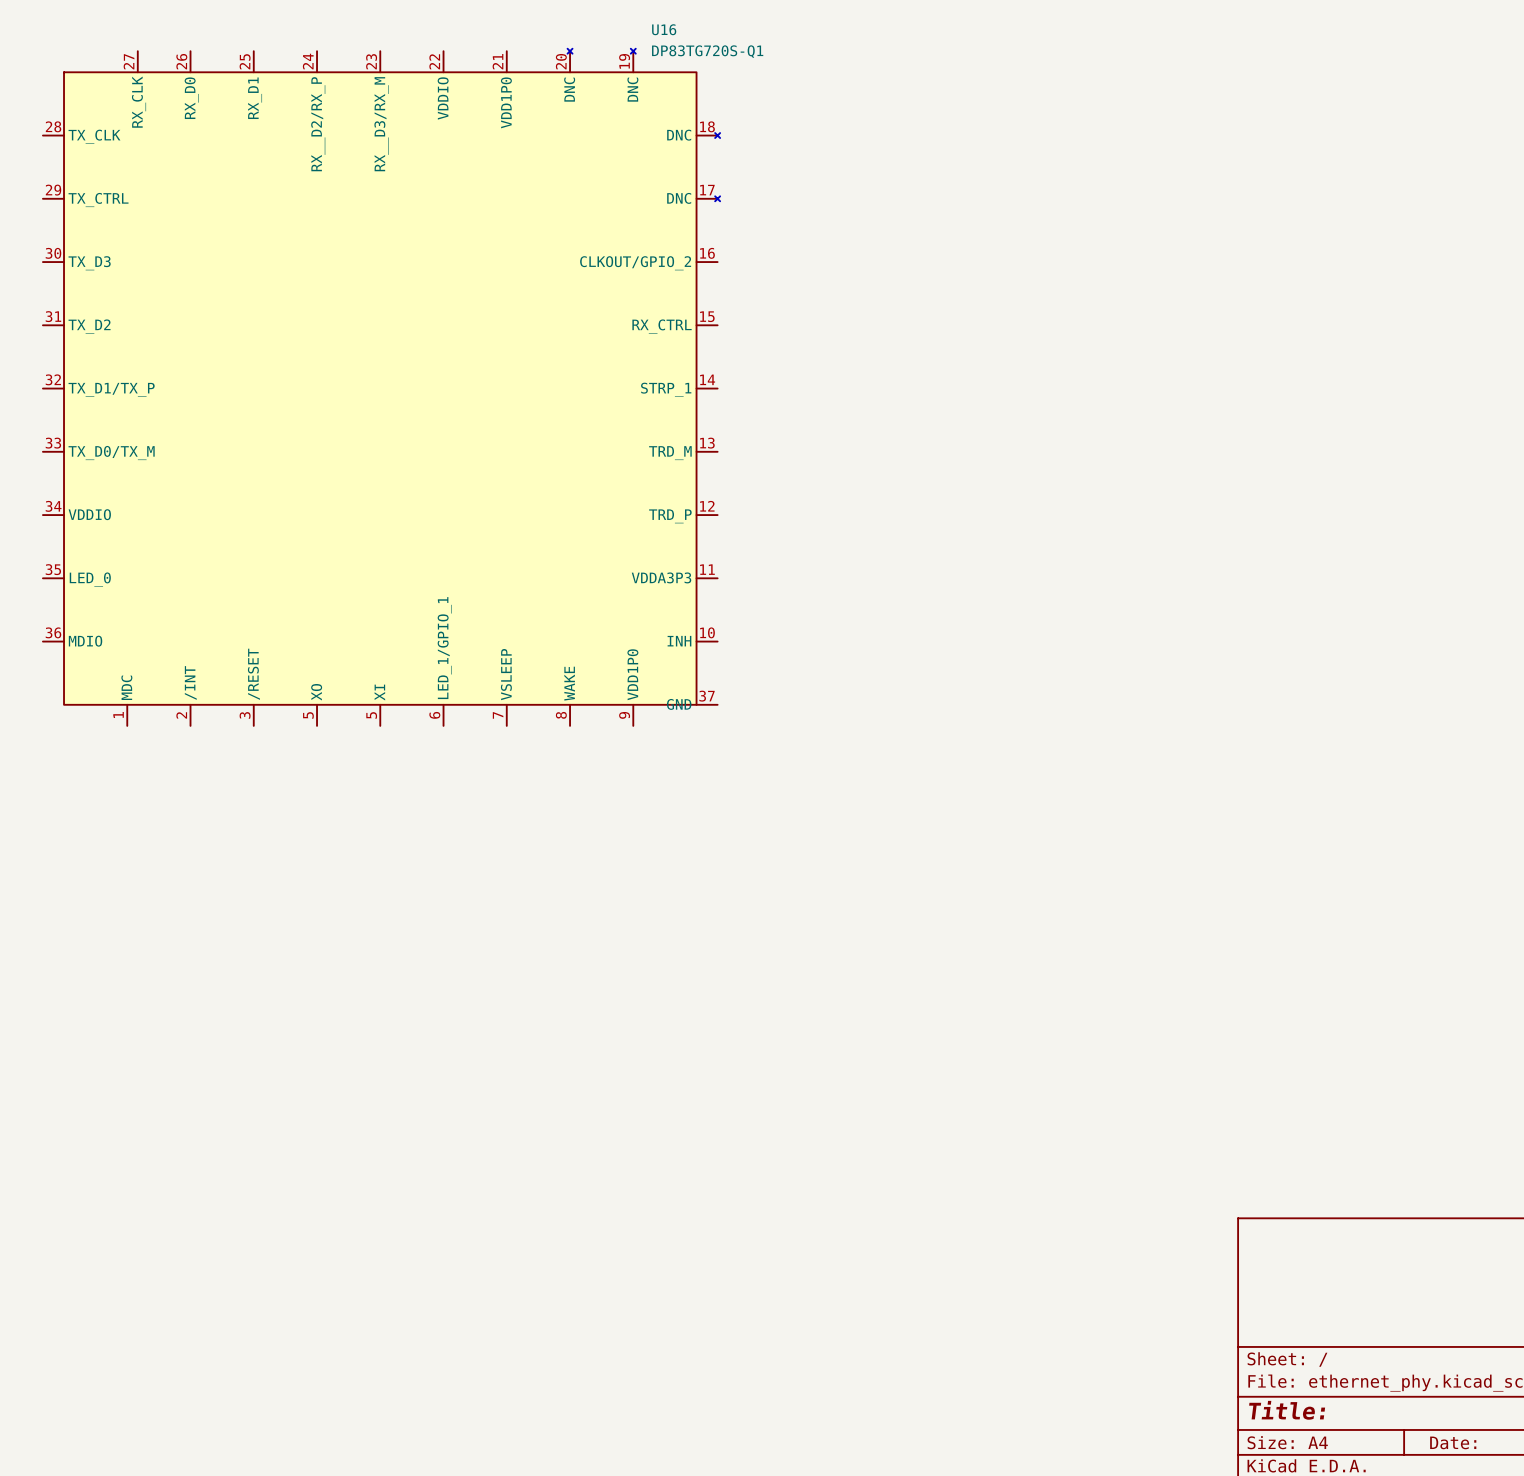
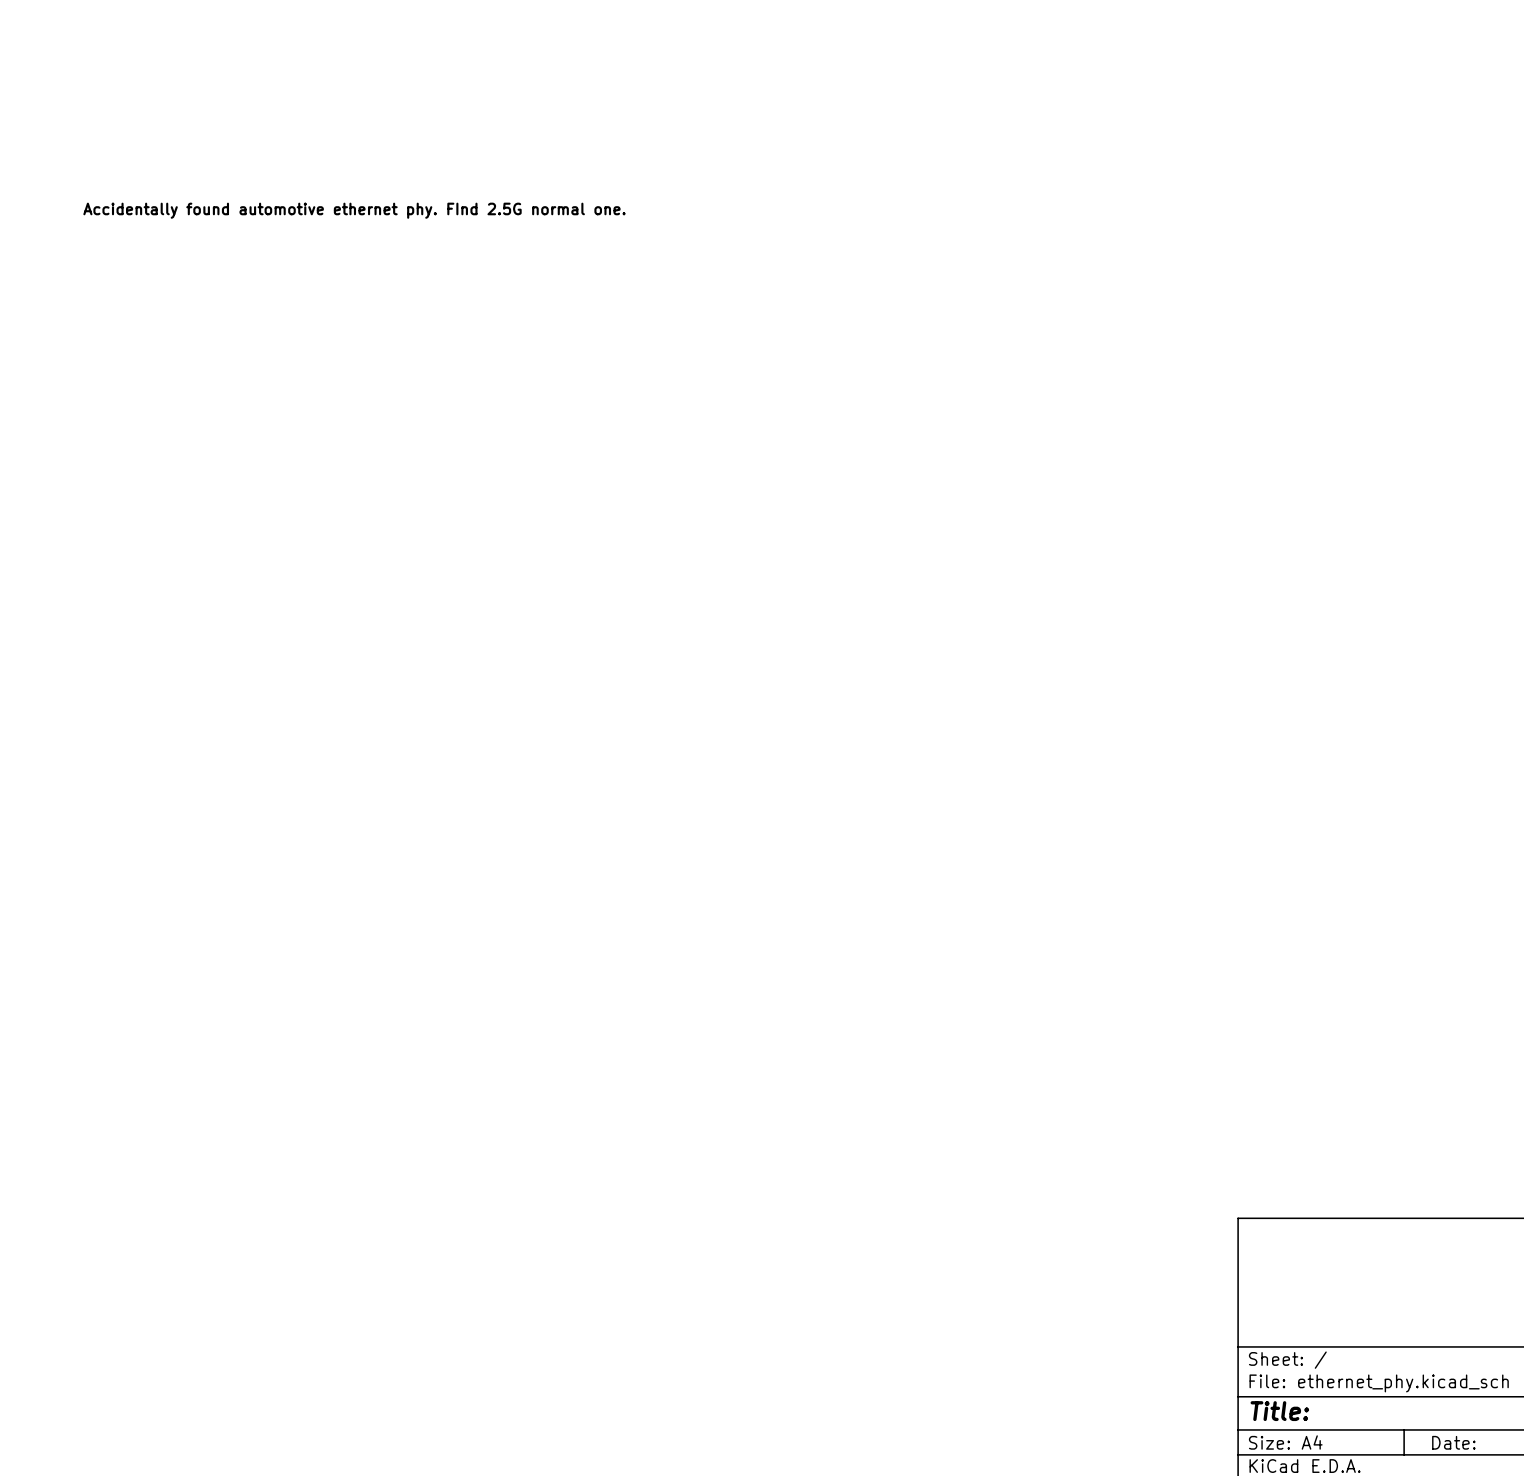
text: none -> Accidentally found automotive ethernet phy. FInd 2.5G normal one. (354, 210)
U16: DP83TG720S-Q1 (381, 387) -> none

